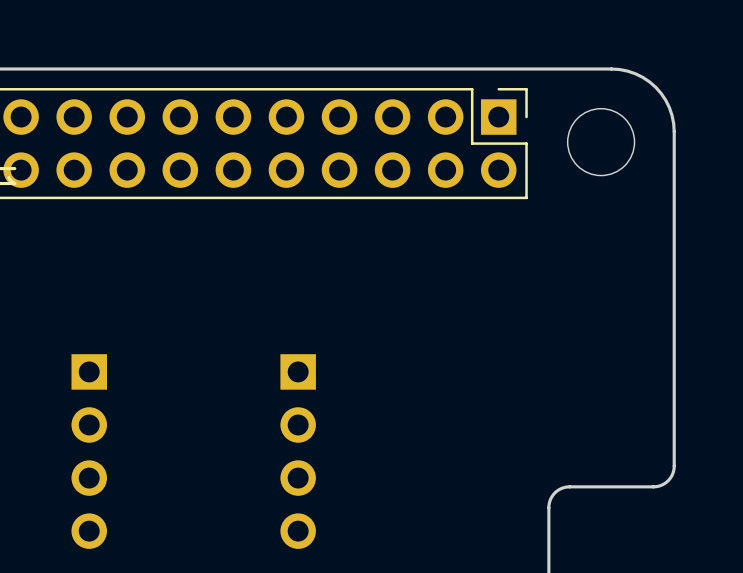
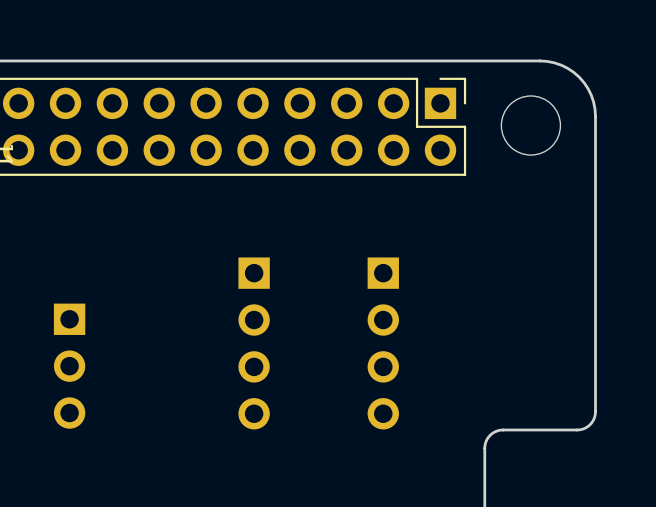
part: none -> (383, 343)
part: none -> (69, 366)
part: (89, 451) -> none
part position: (298, 451) -> (254, 343)

